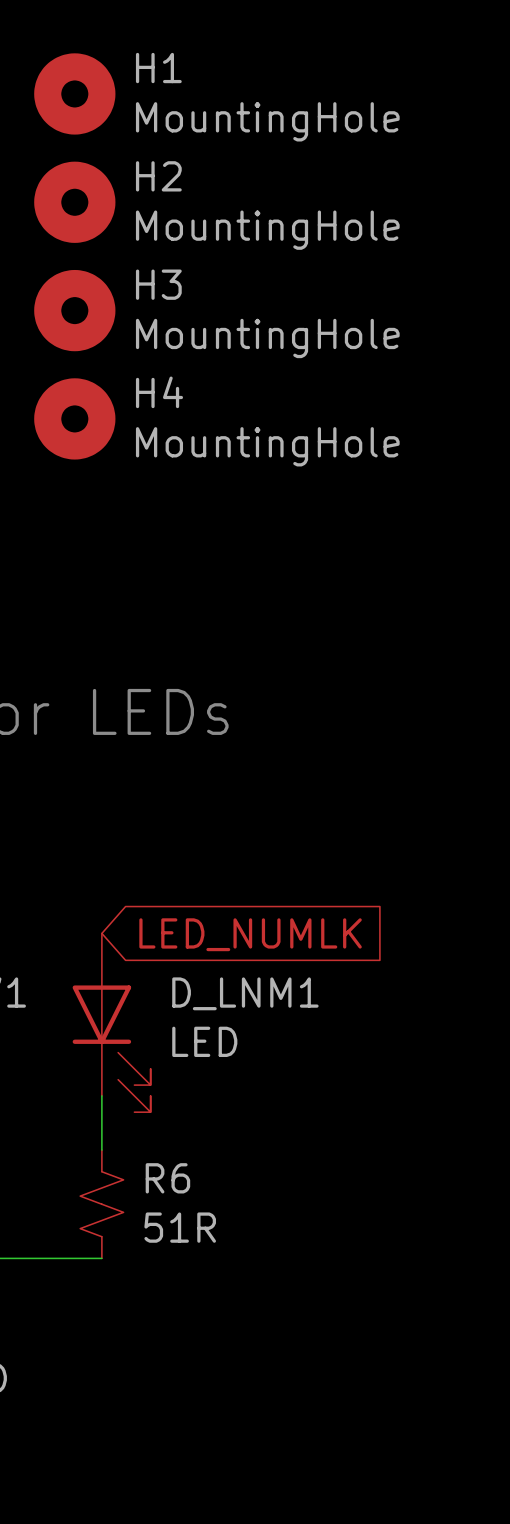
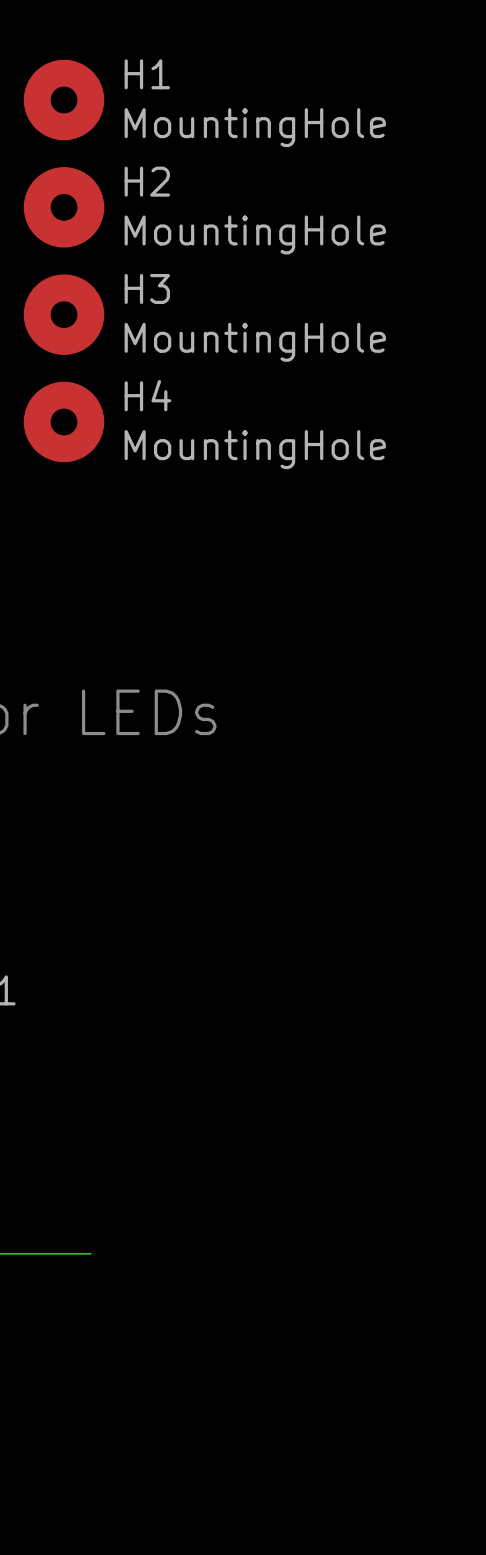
global label: LED_NUMLK (250, 934) -> none
D_LNM1: LED (111, 1022) -> none
wire: (101, 1095) (101, 1150) -> none
R6: 51R (101, 1204) -> none

